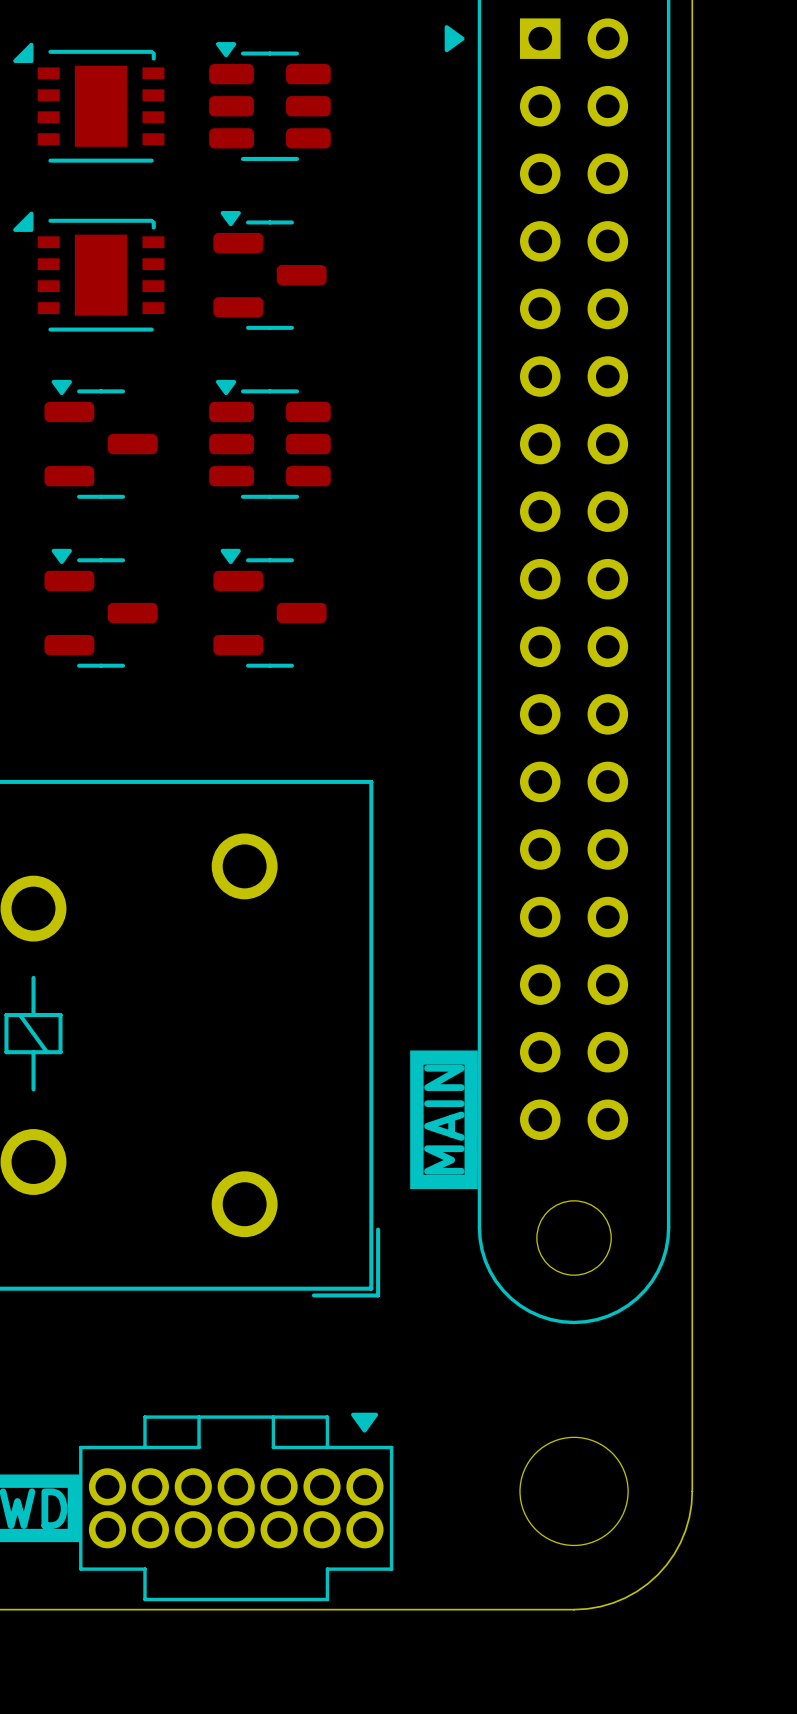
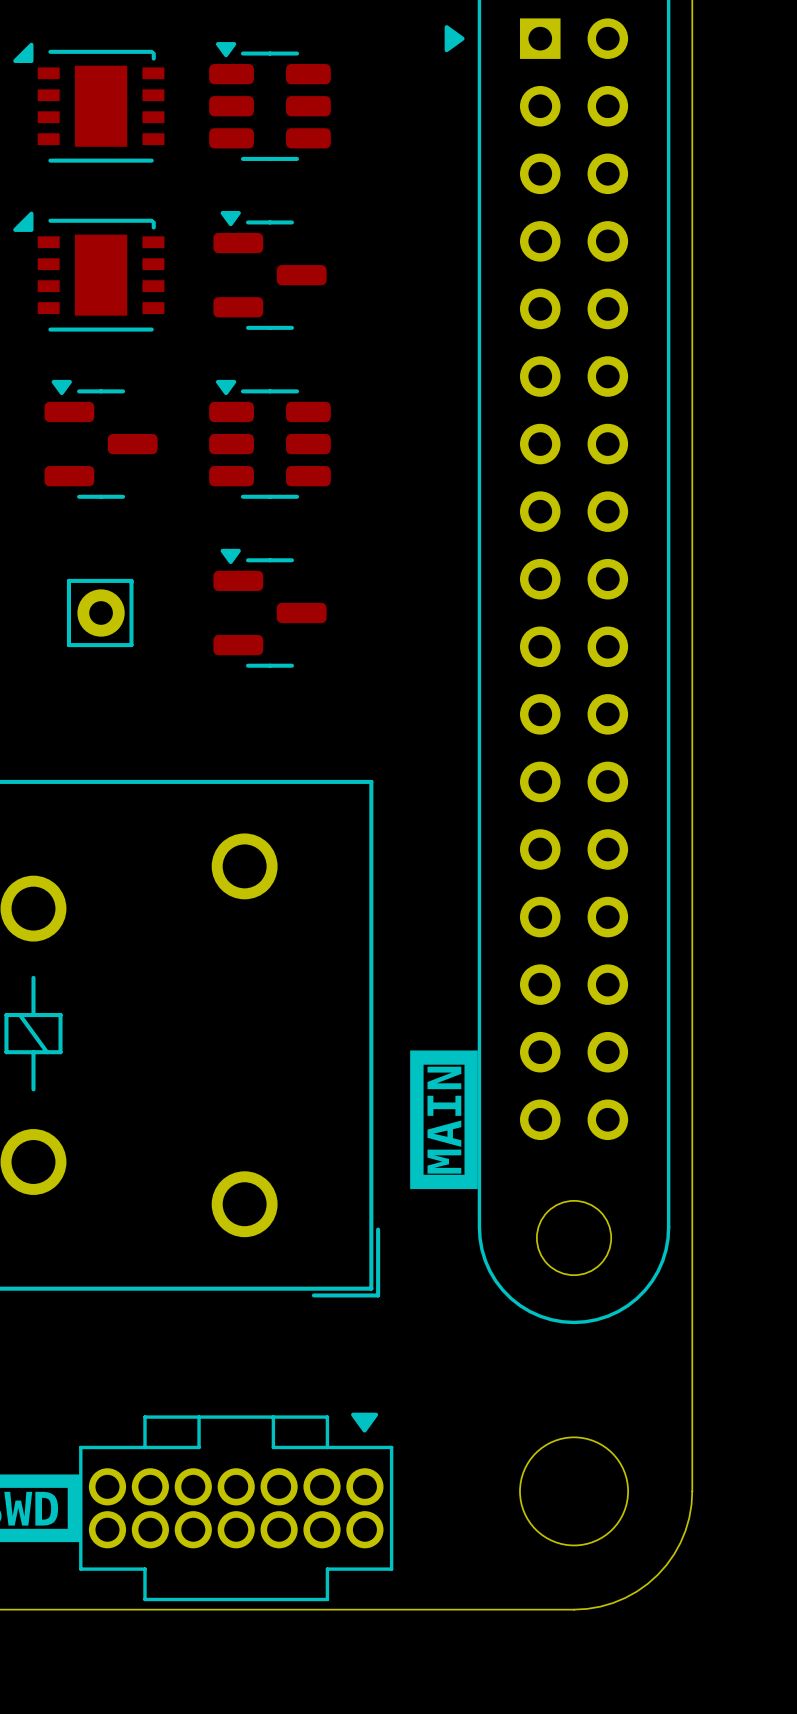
part footprint: [44, 548, 158, 668] -> [66, 578, 134, 648]

